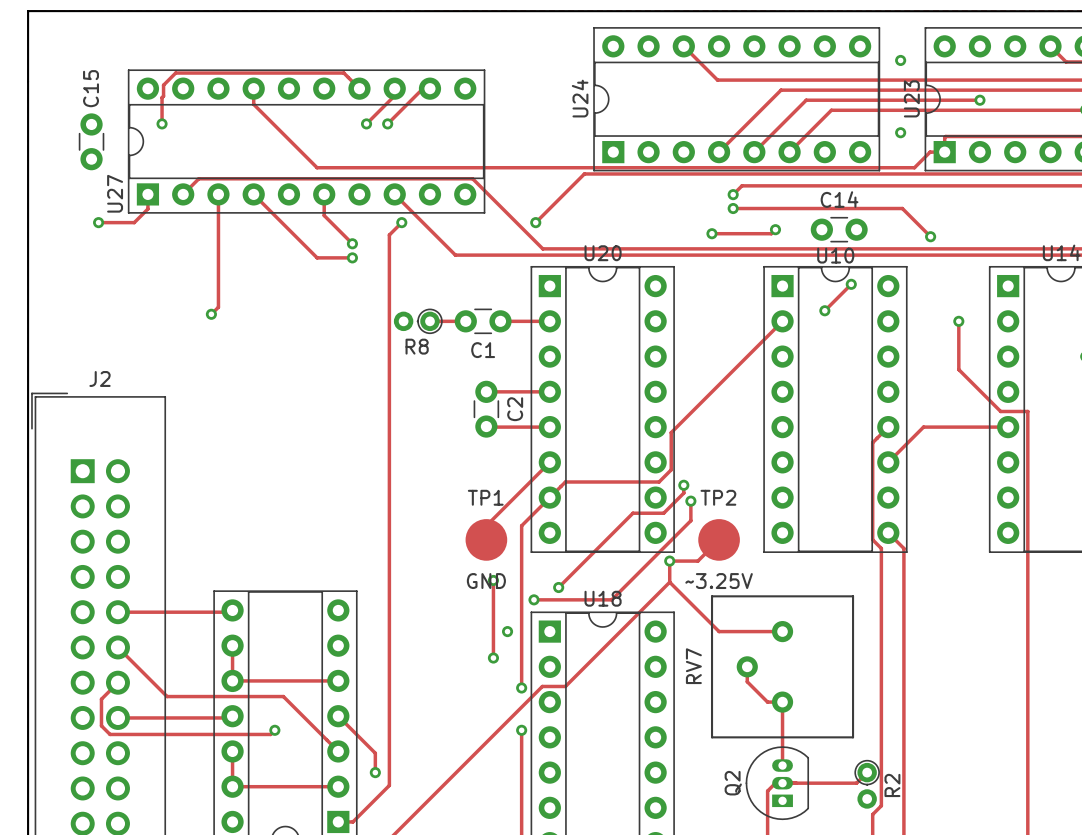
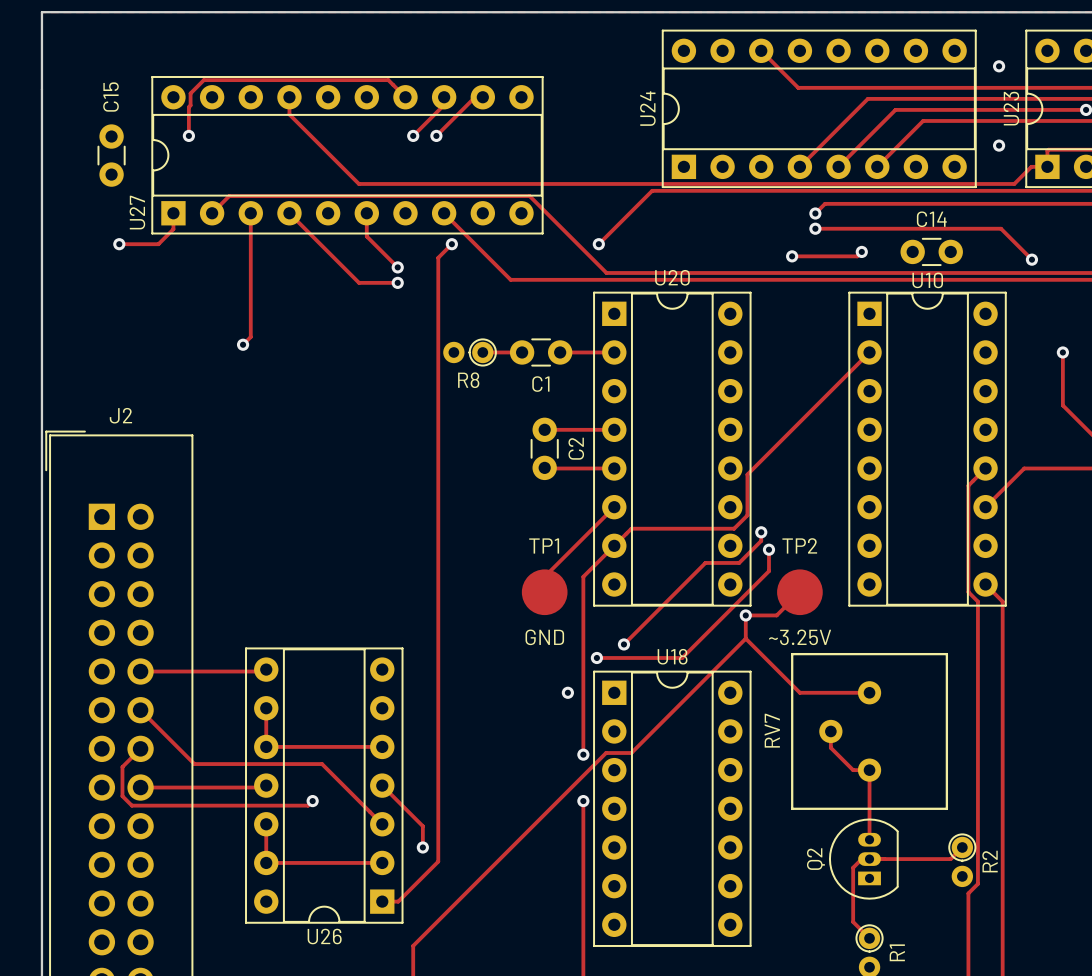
track: (851, 284) (824, 310) -> none
via: (851, 284) -> none
via: (824, 310) -> none
track: (493, 580) (493, 658) -> none
via: (493, 580) -> none
via: (493, 658) -> none

